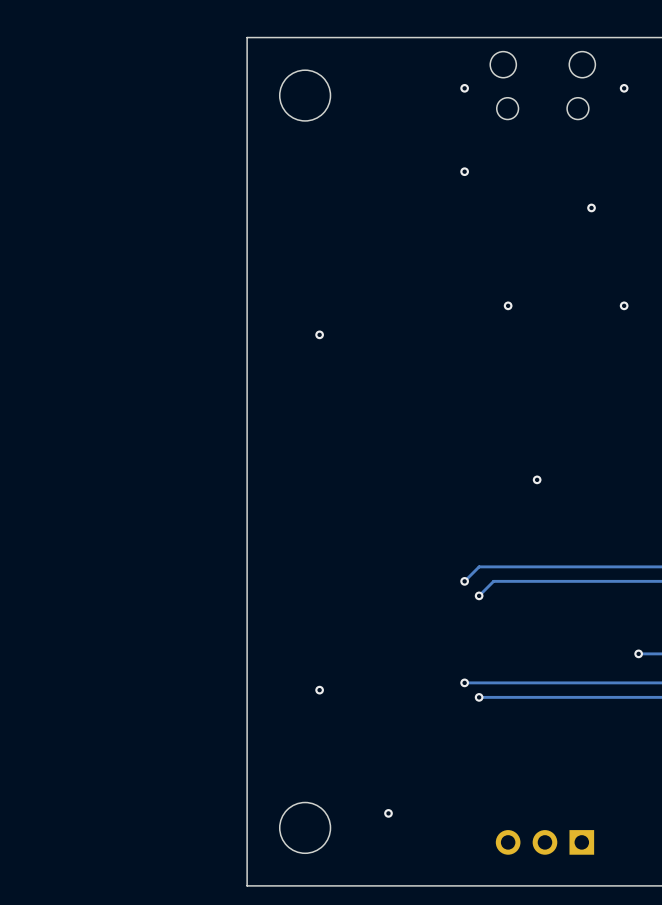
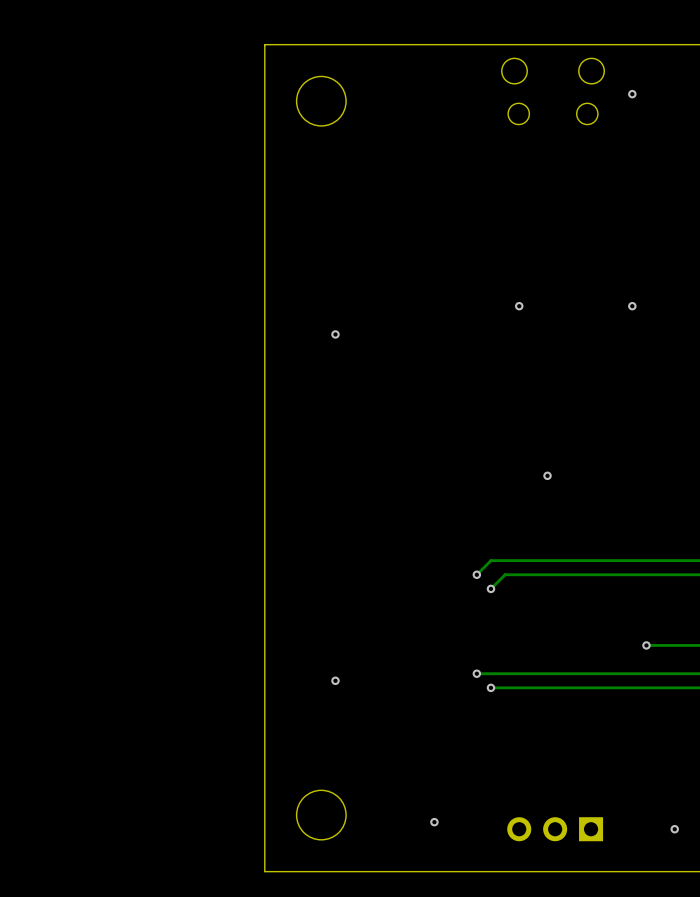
via: (464, 88) -> none
via: (464, 171) -> none
via: (591, 207) -> none
via position: (388, 813) -> (434, 822)

